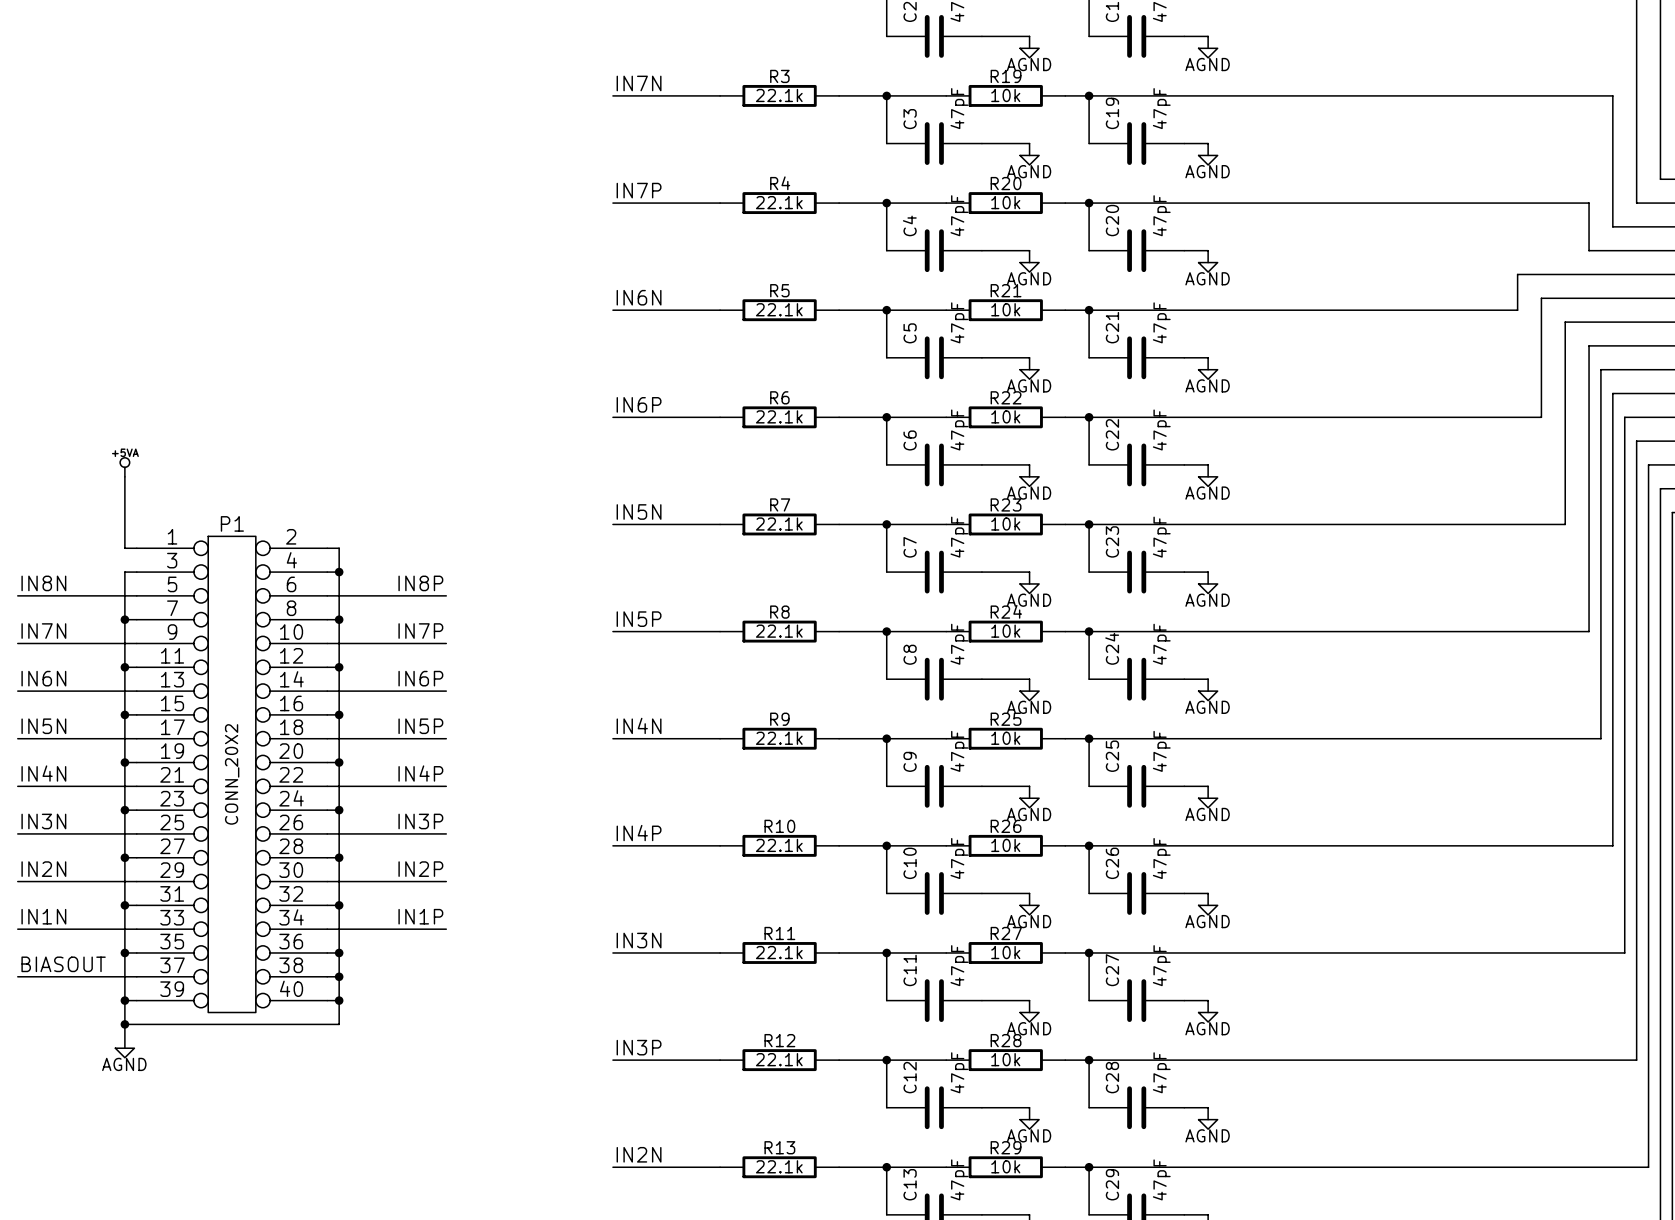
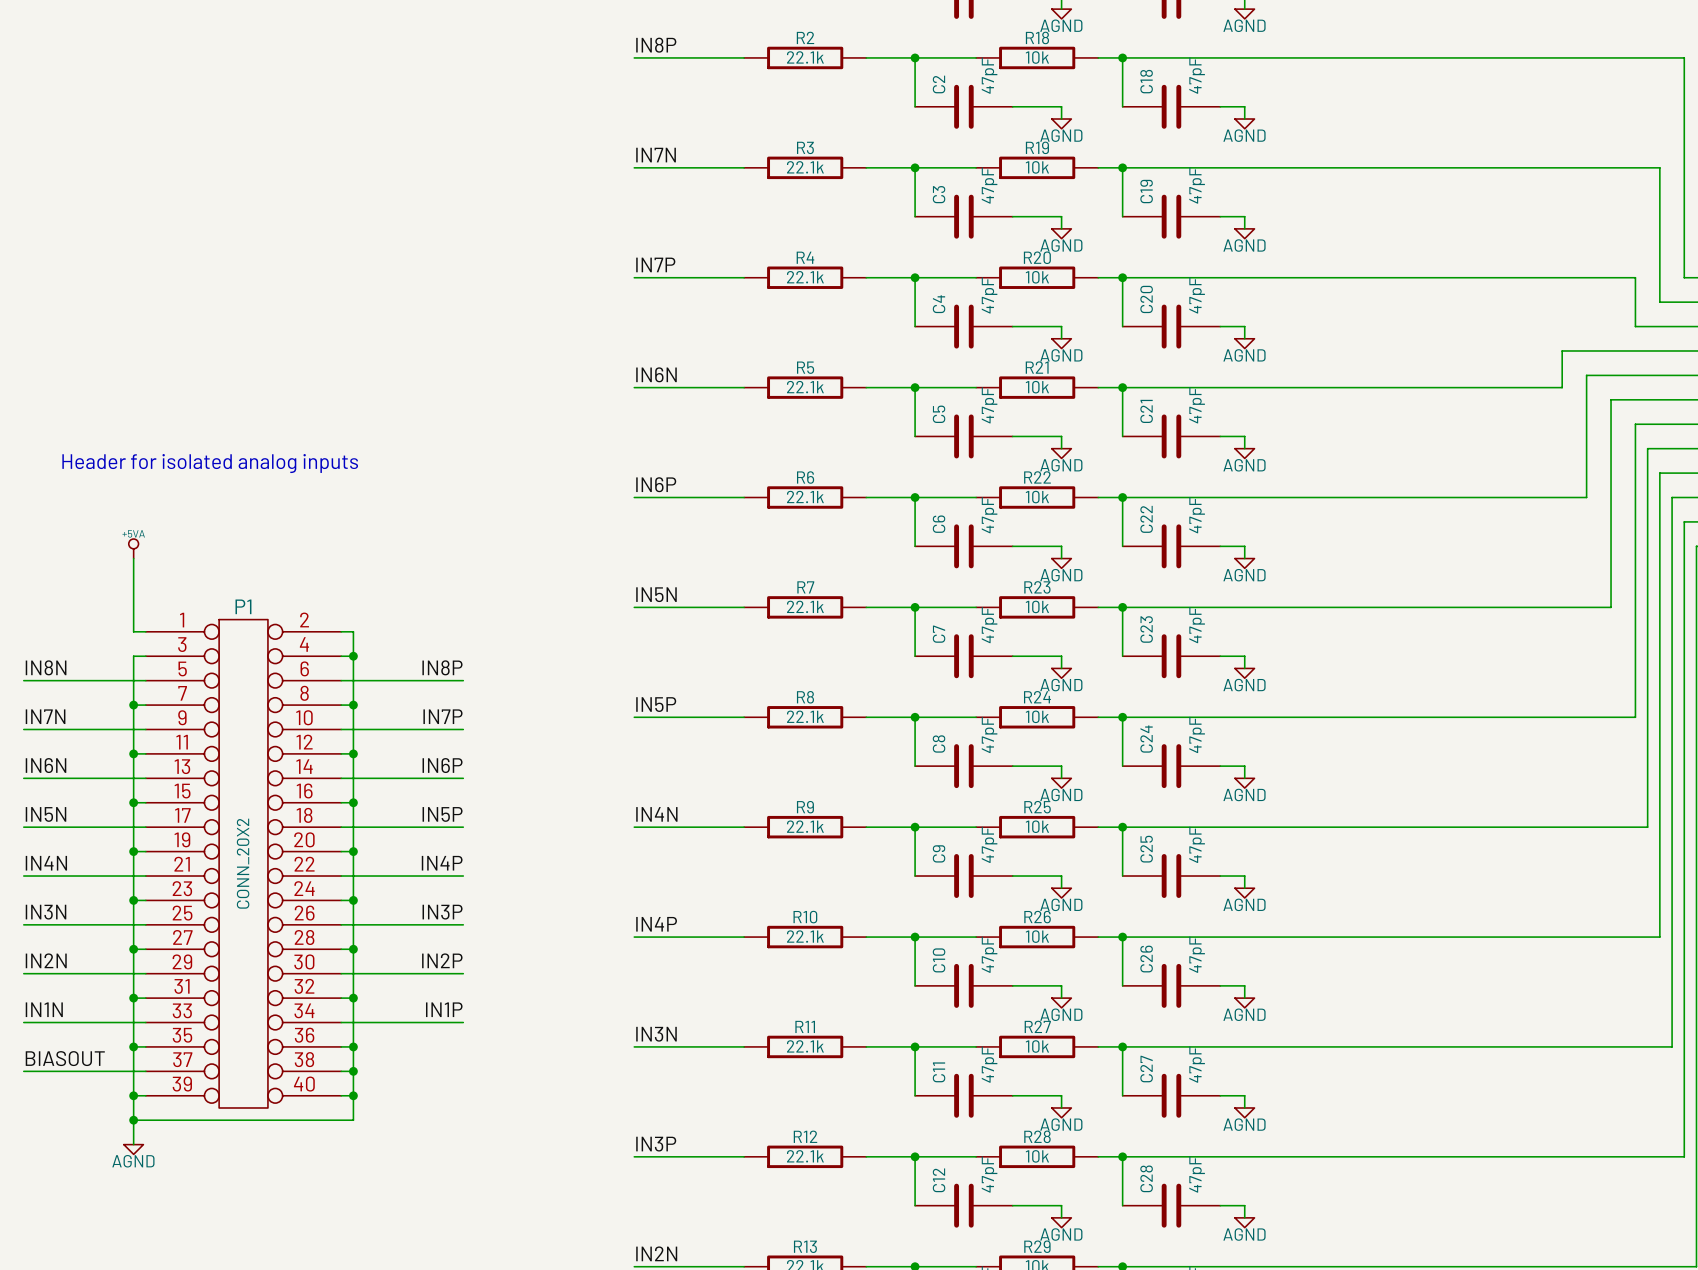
text: none -> Header for isolated analog inputs (210, 463)

